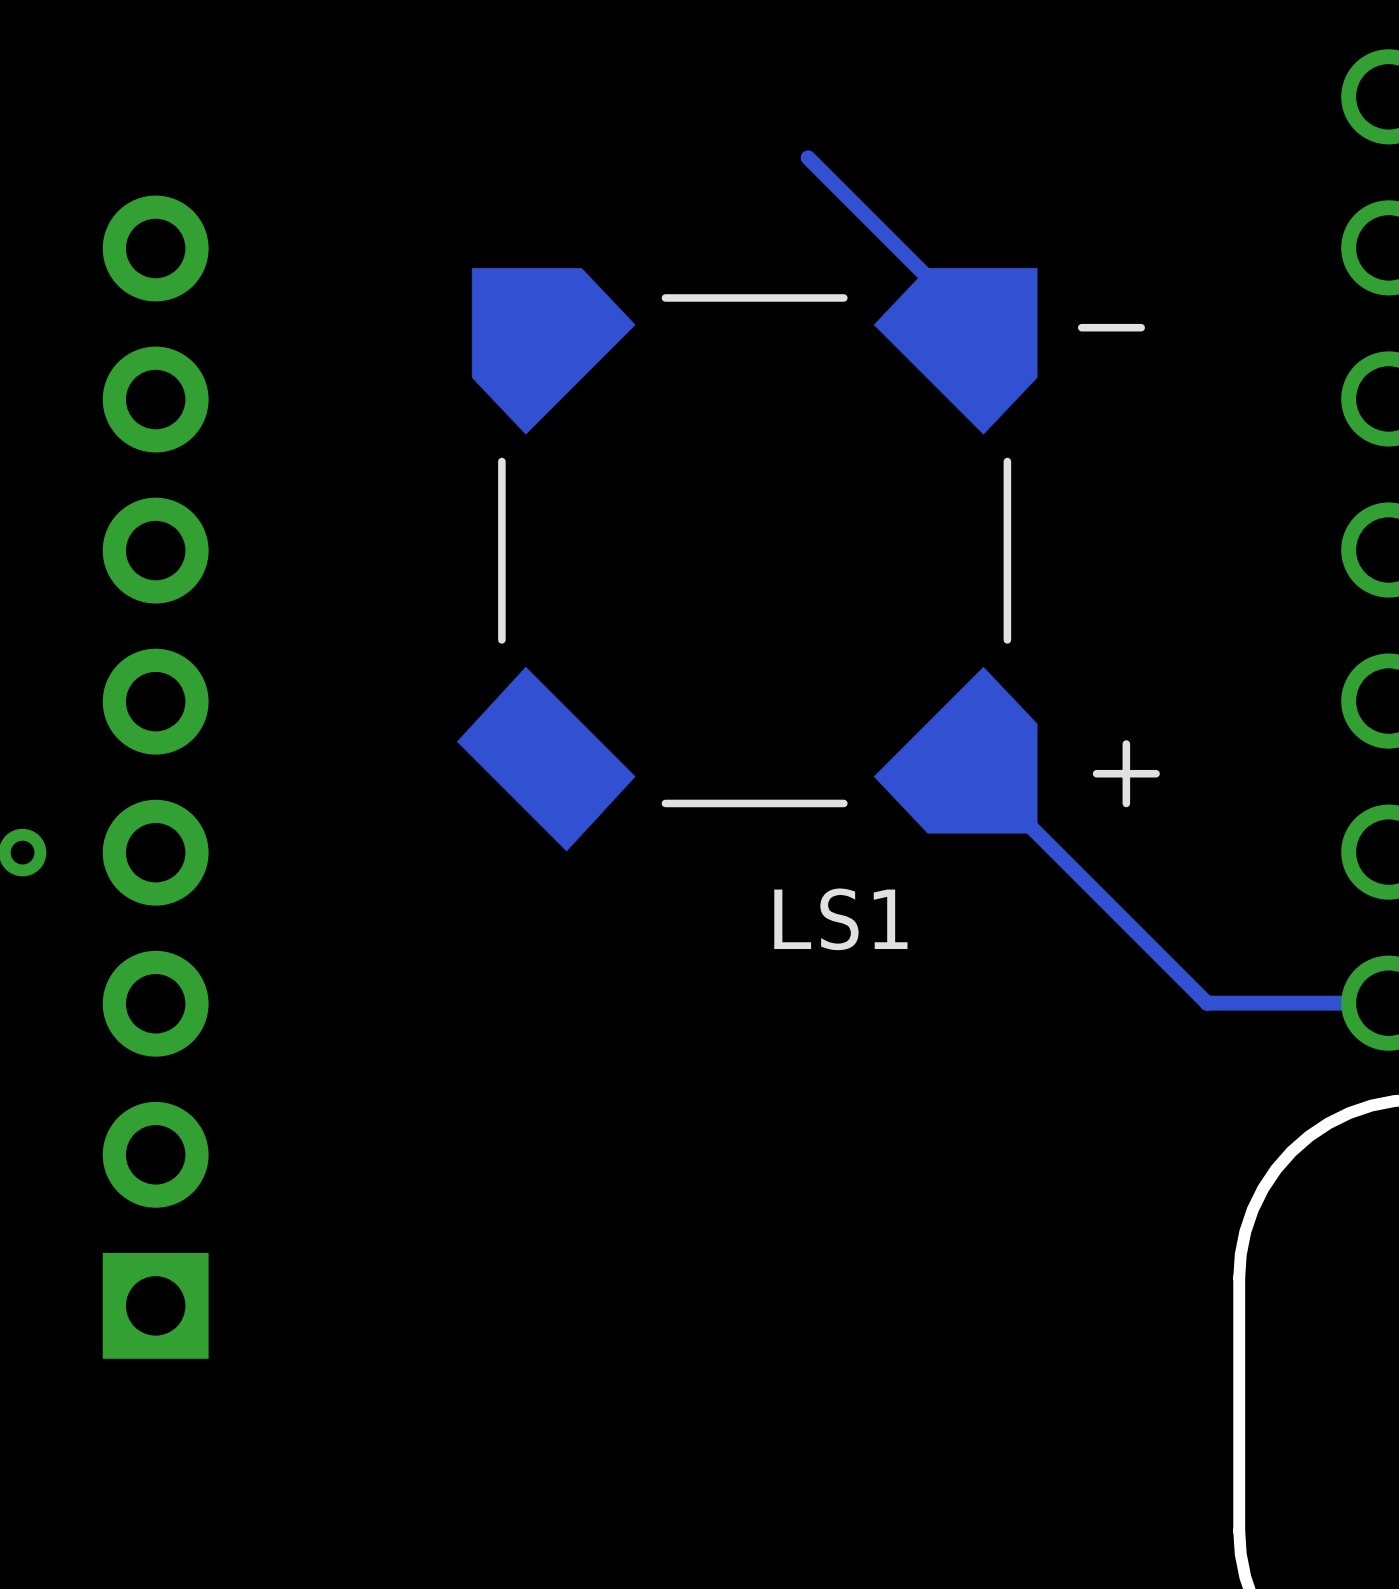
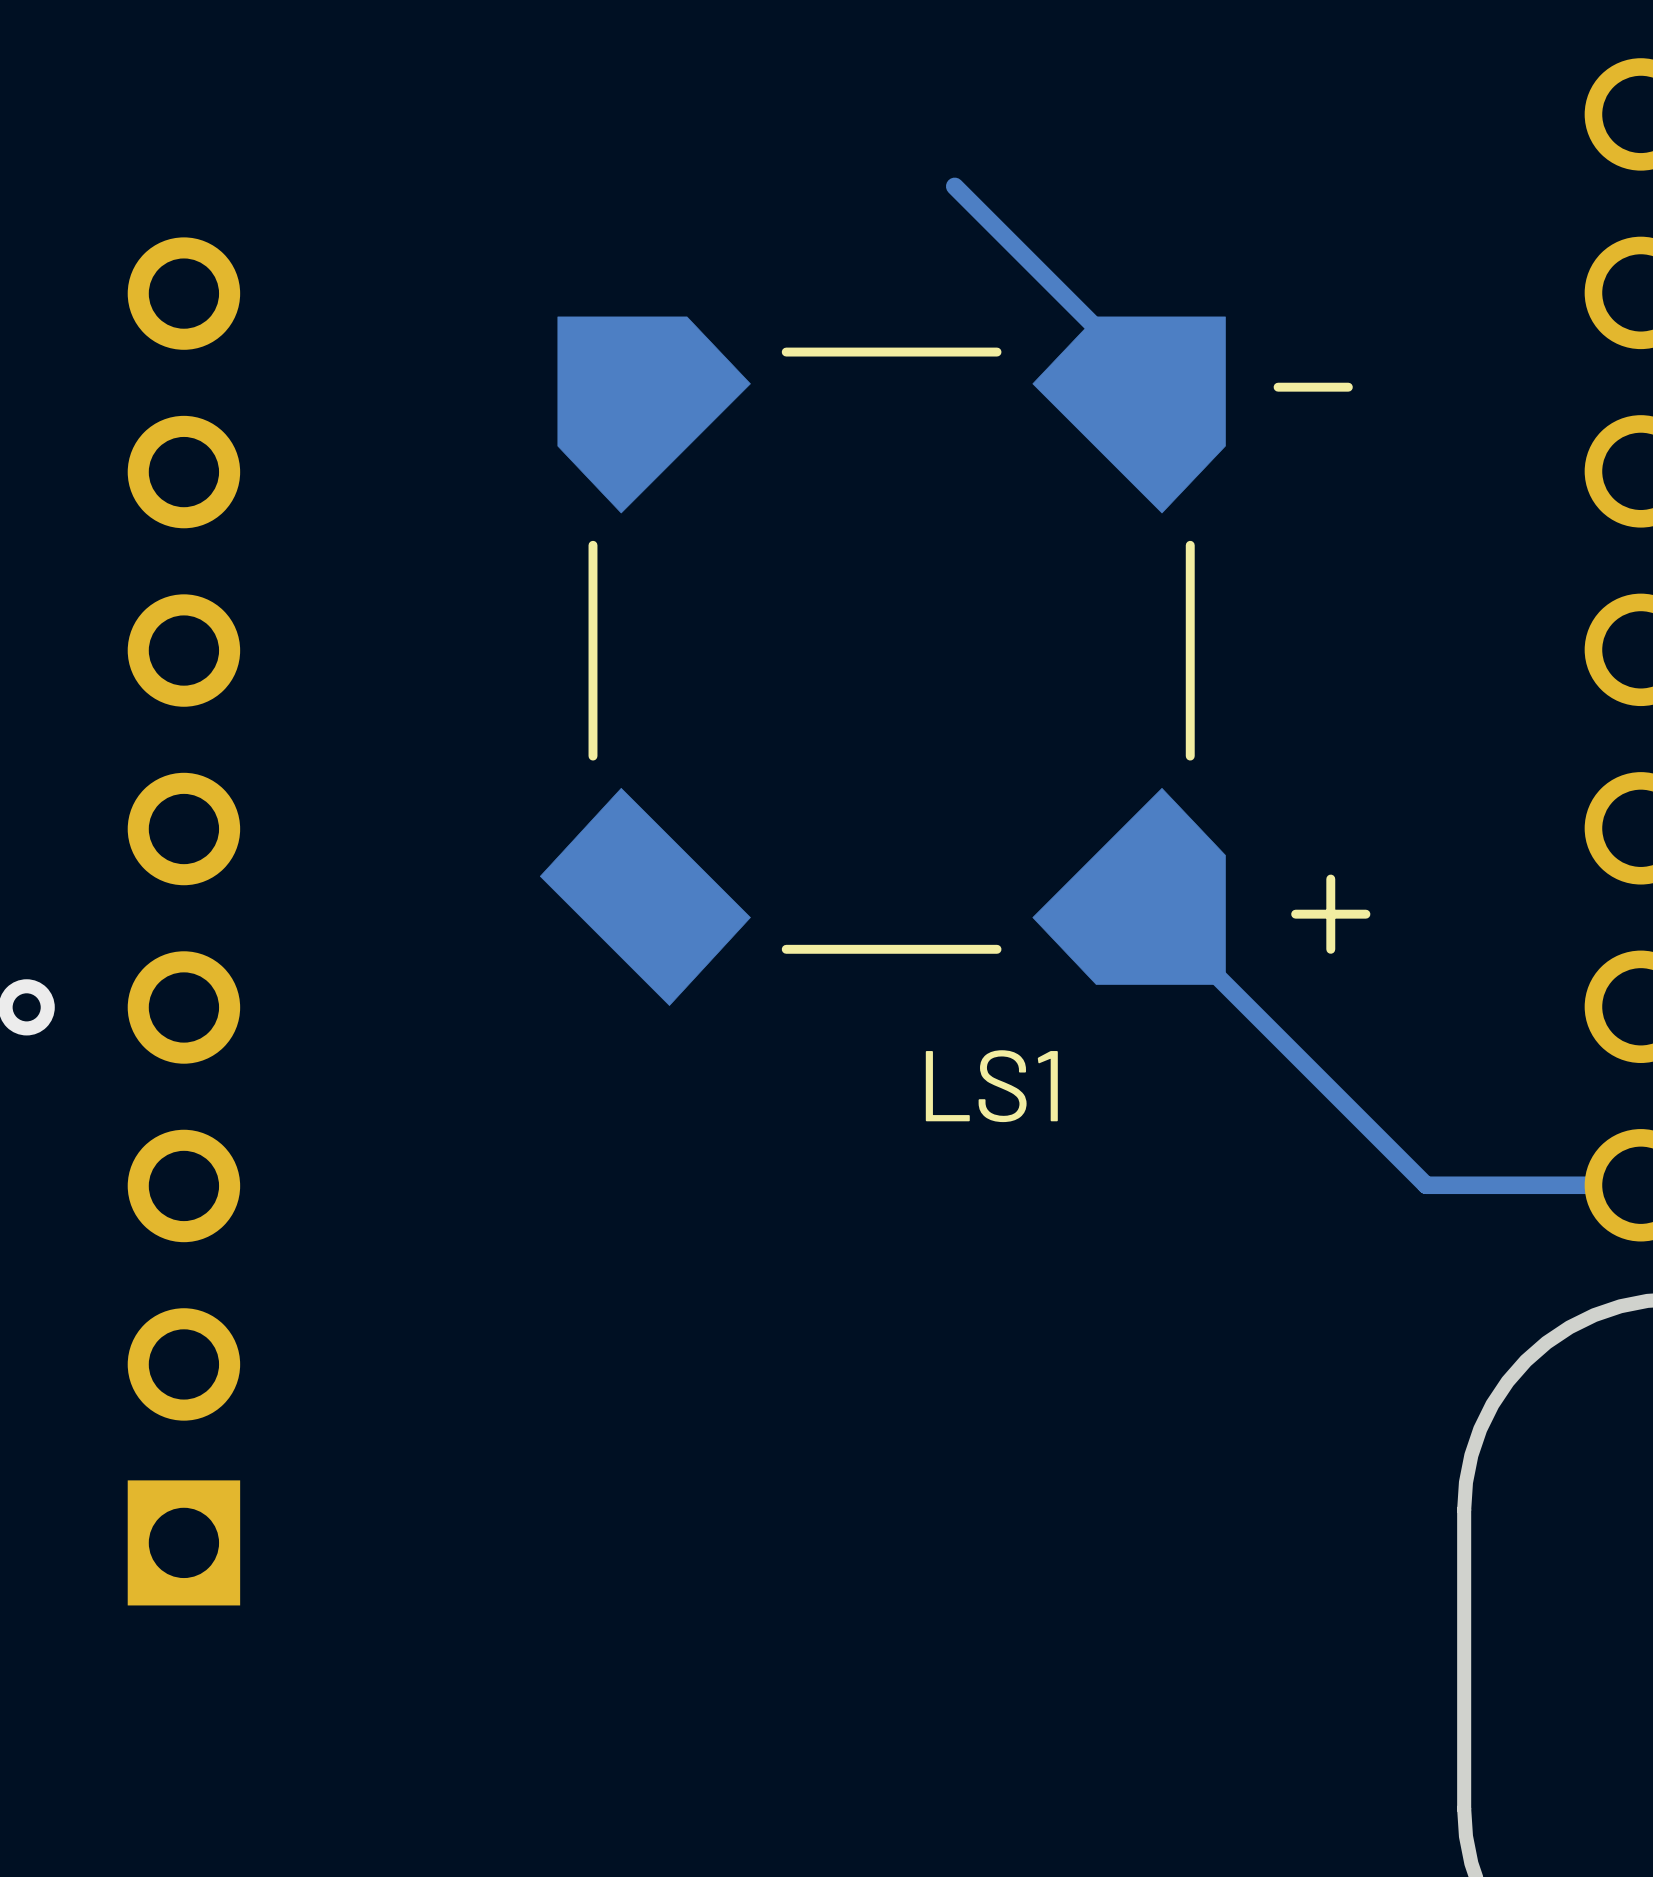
part footprint: [102, 195, 209, 1359] -> [127, 237, 241, 1606]

